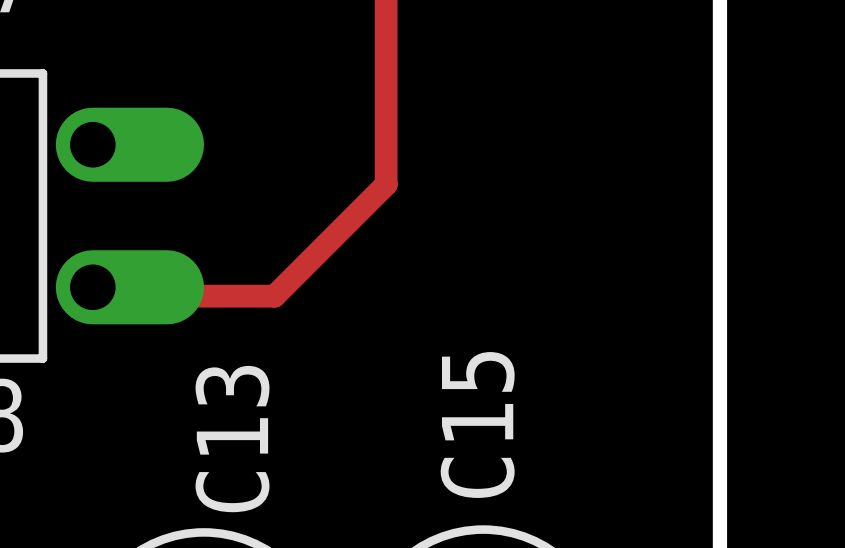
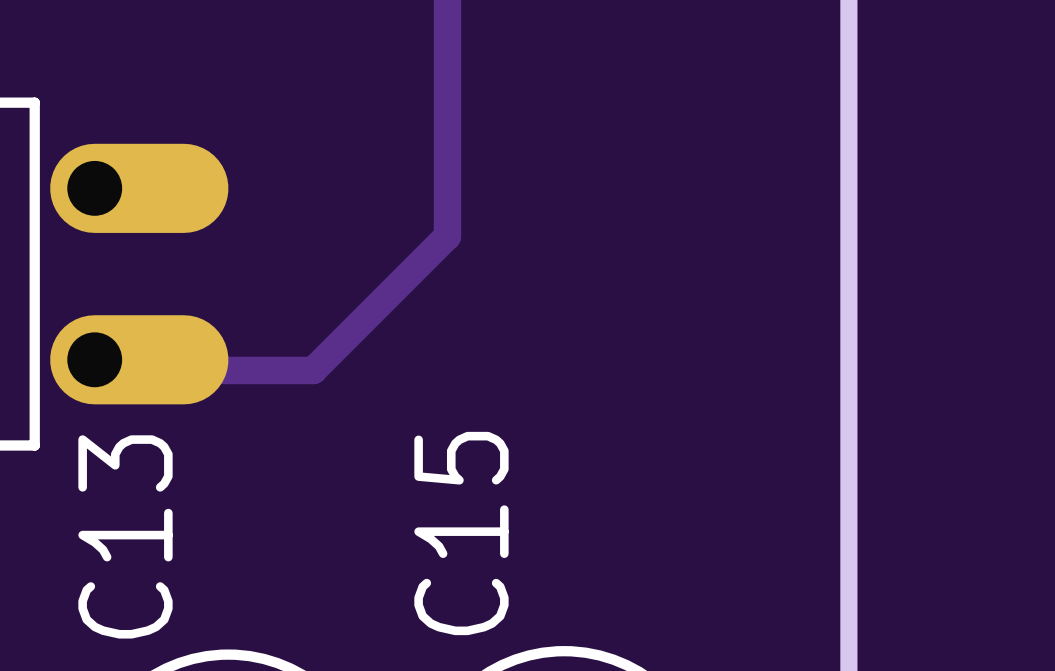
C15 name position: C15 (477, 425) -> C15 (461, 533)
C13 name position: C13 (232, 439) -> C13 (125, 536)

